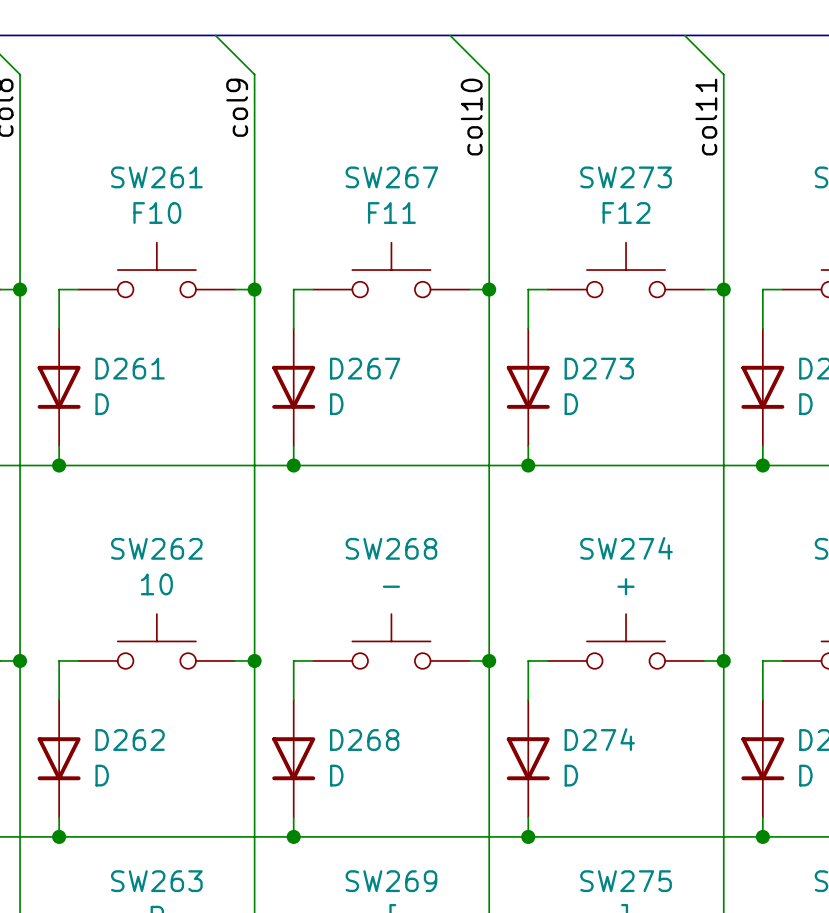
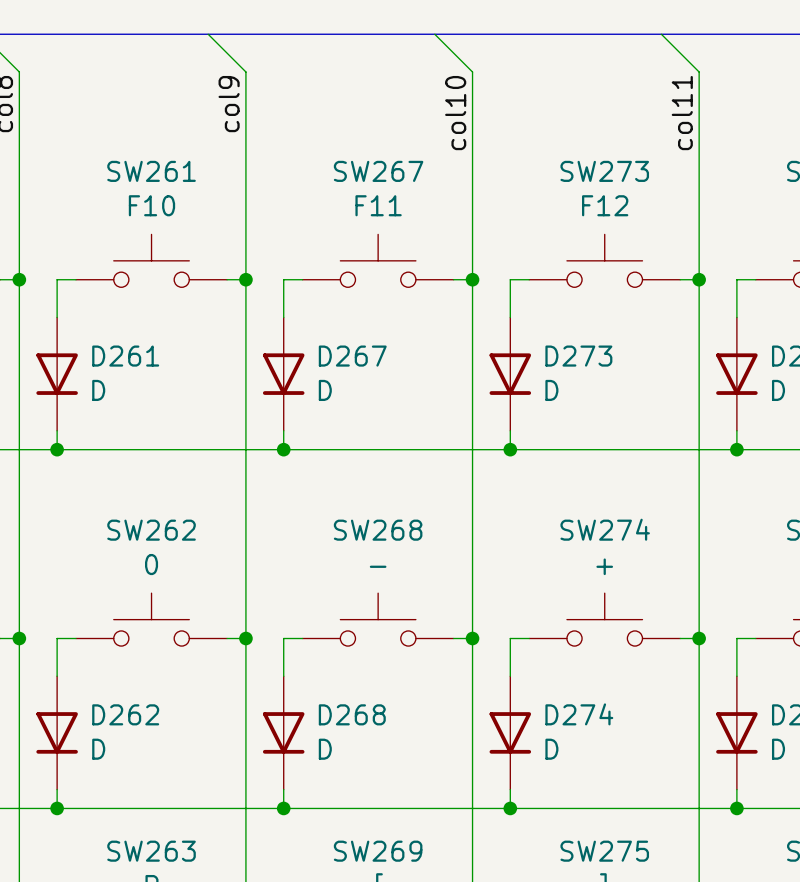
SW262 value: 10 (156, 584) -> 0 (151, 564)

